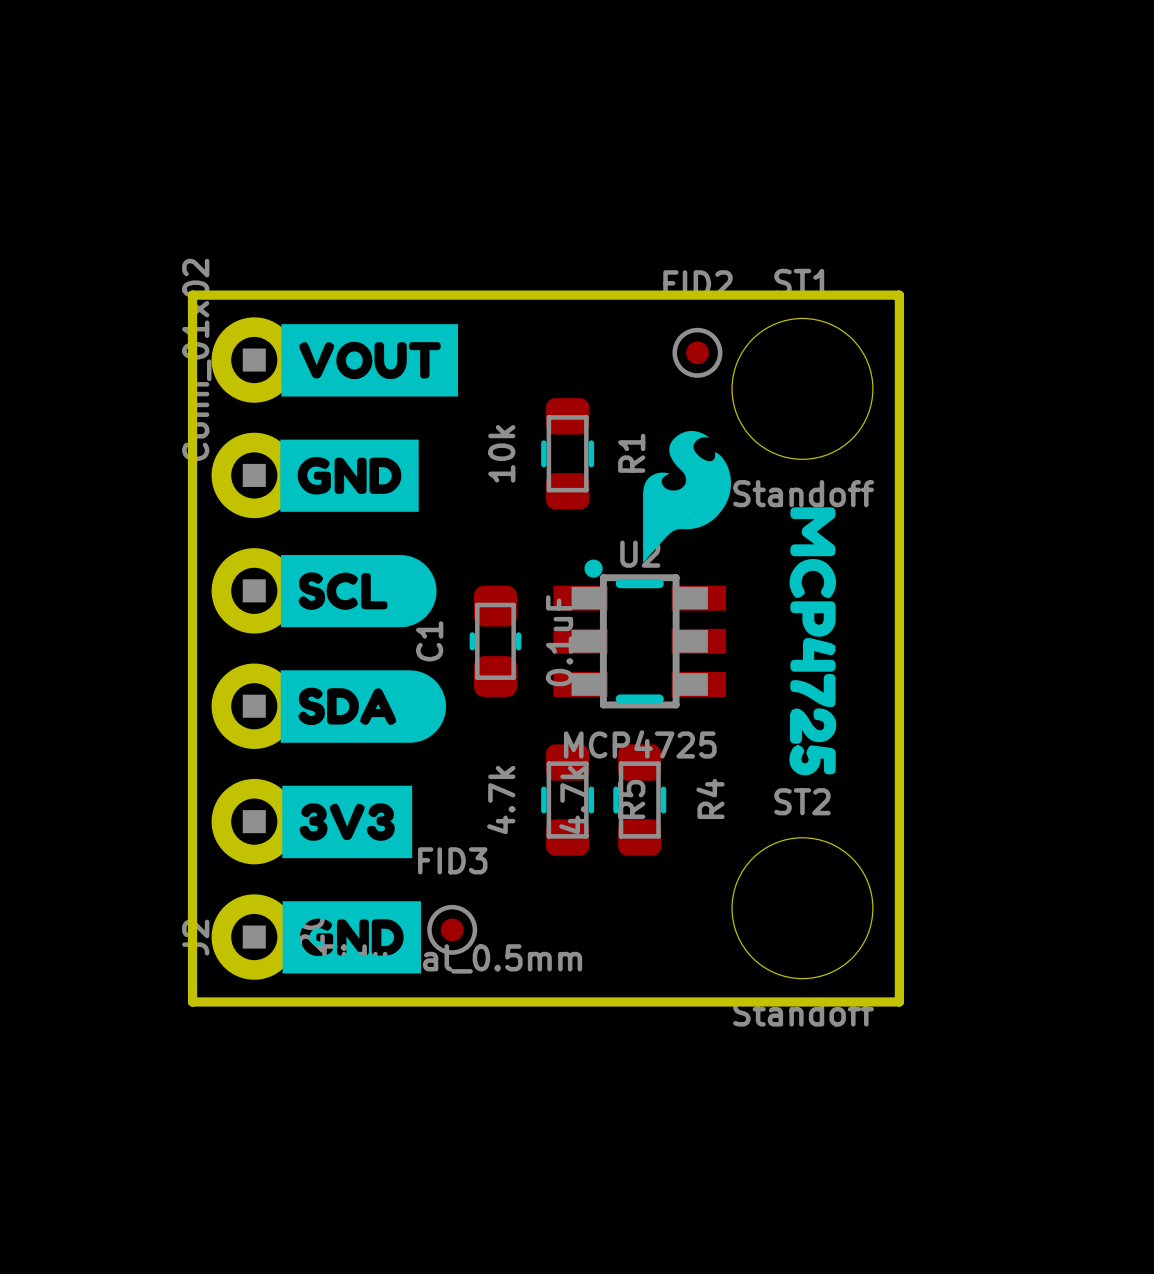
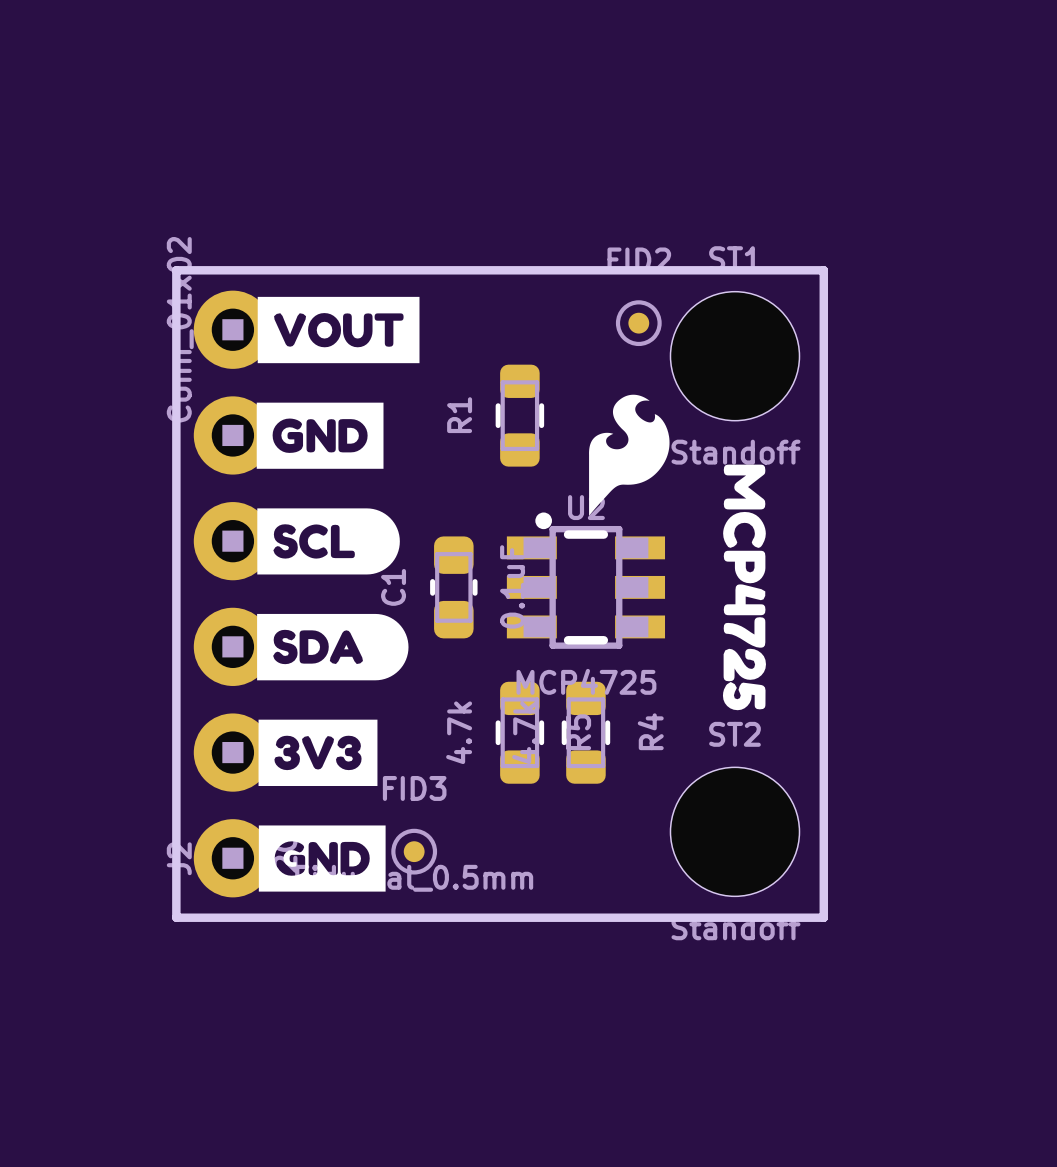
R1 value: 10k (501, 453) -> none
R1 name position: R1 (631, 453) -> R1 (459, 415)

